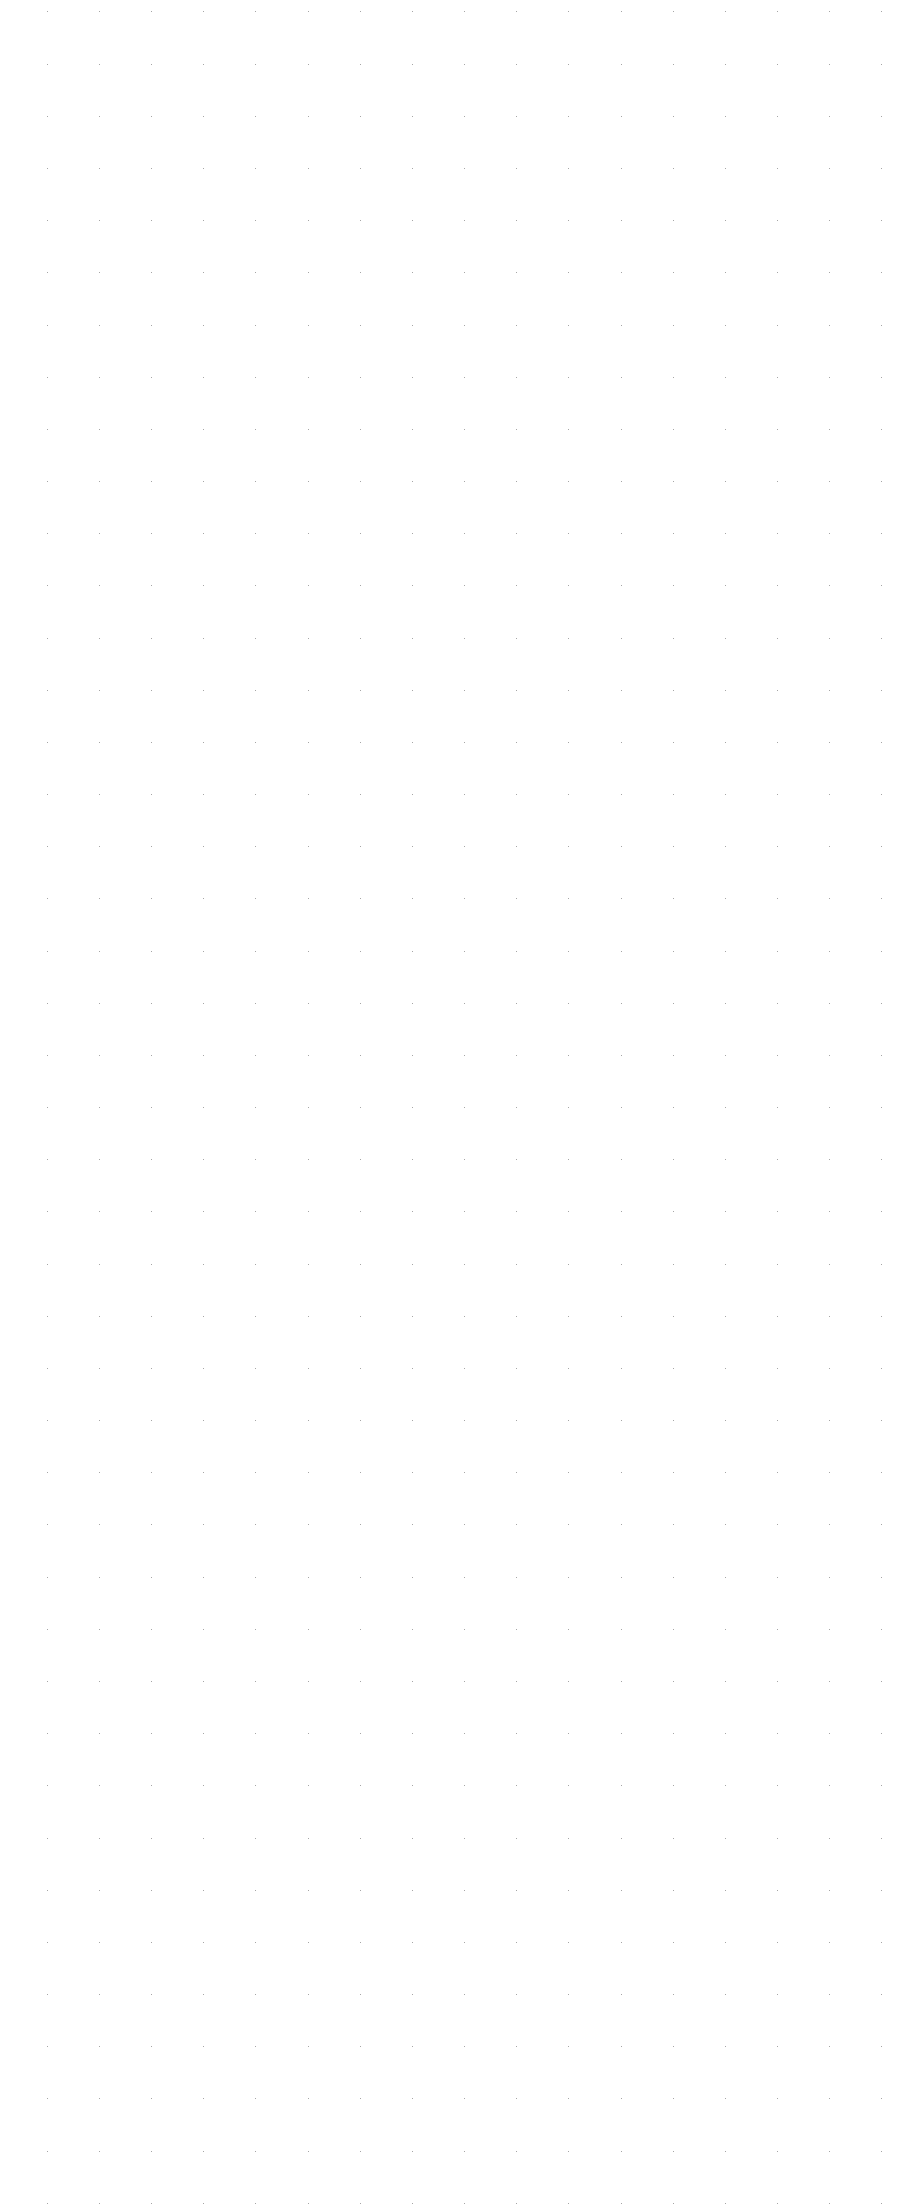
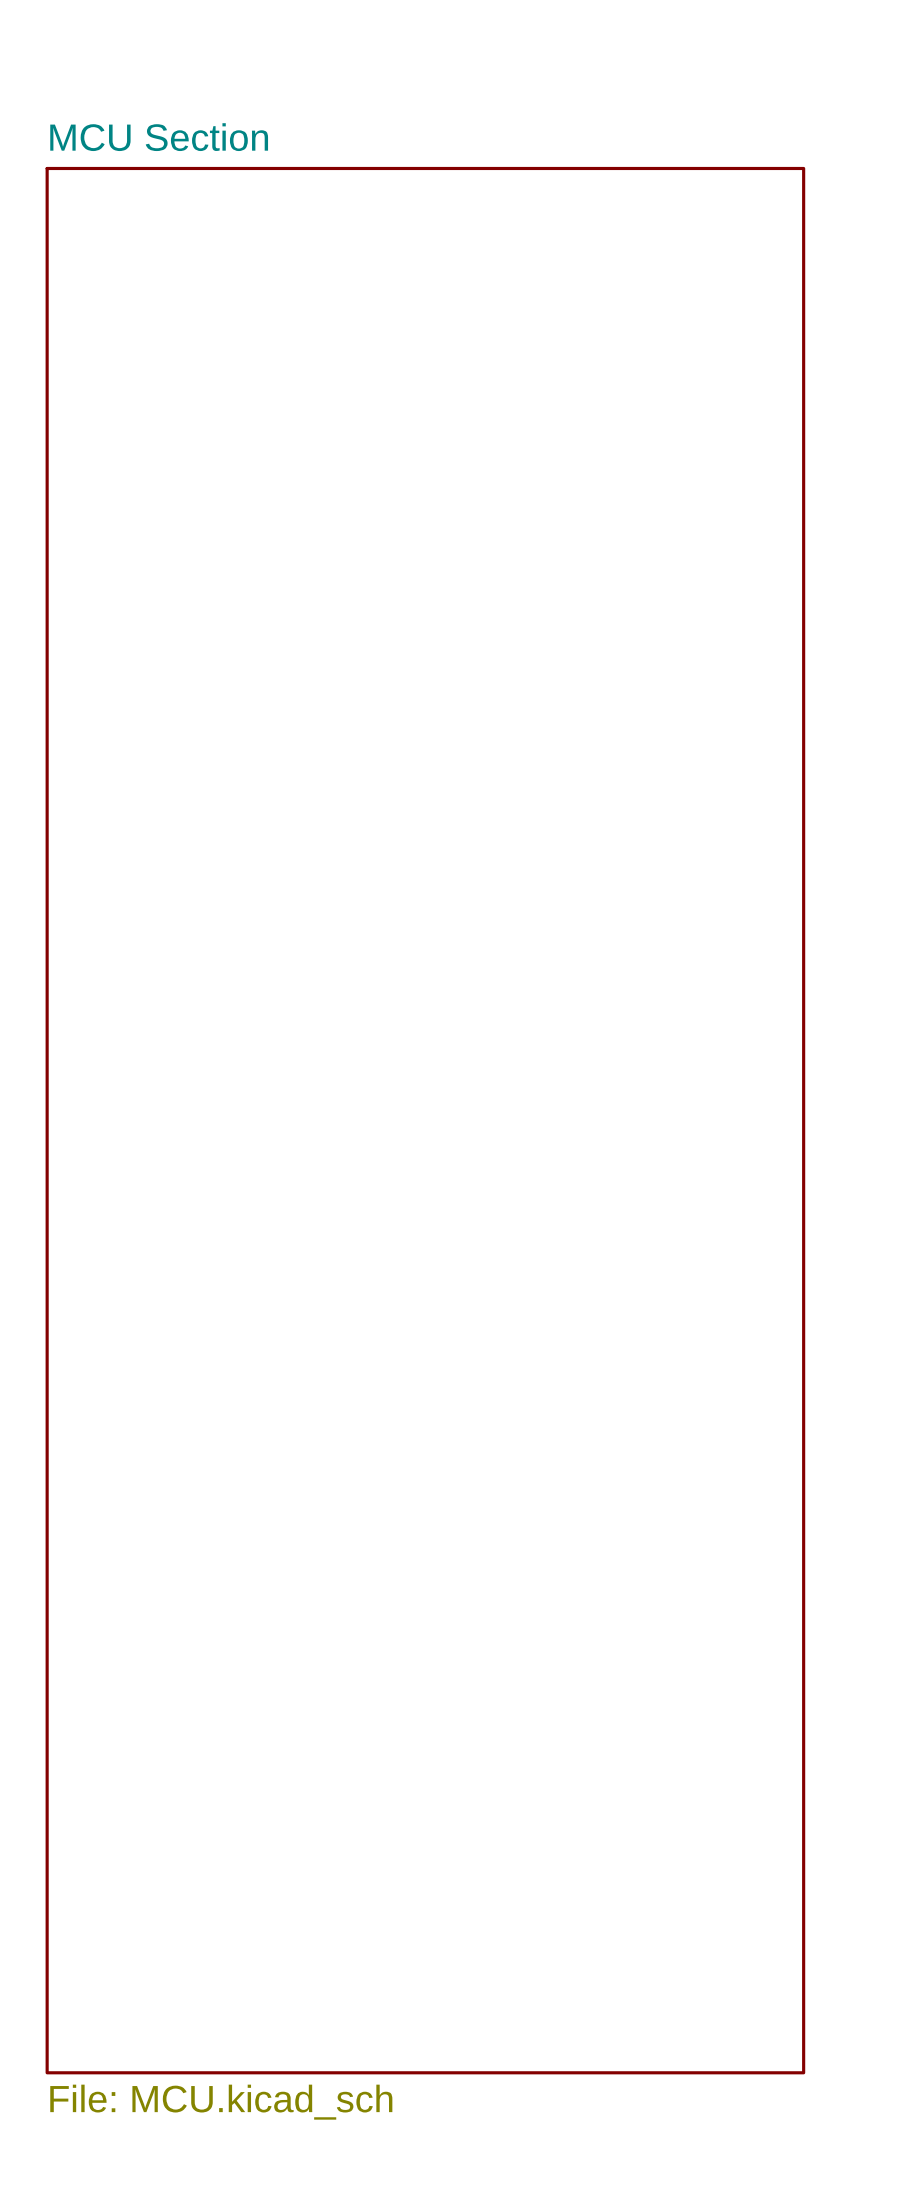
sheet MCU Section: none -> File: MCU.kicad_sch (425, 1120)

